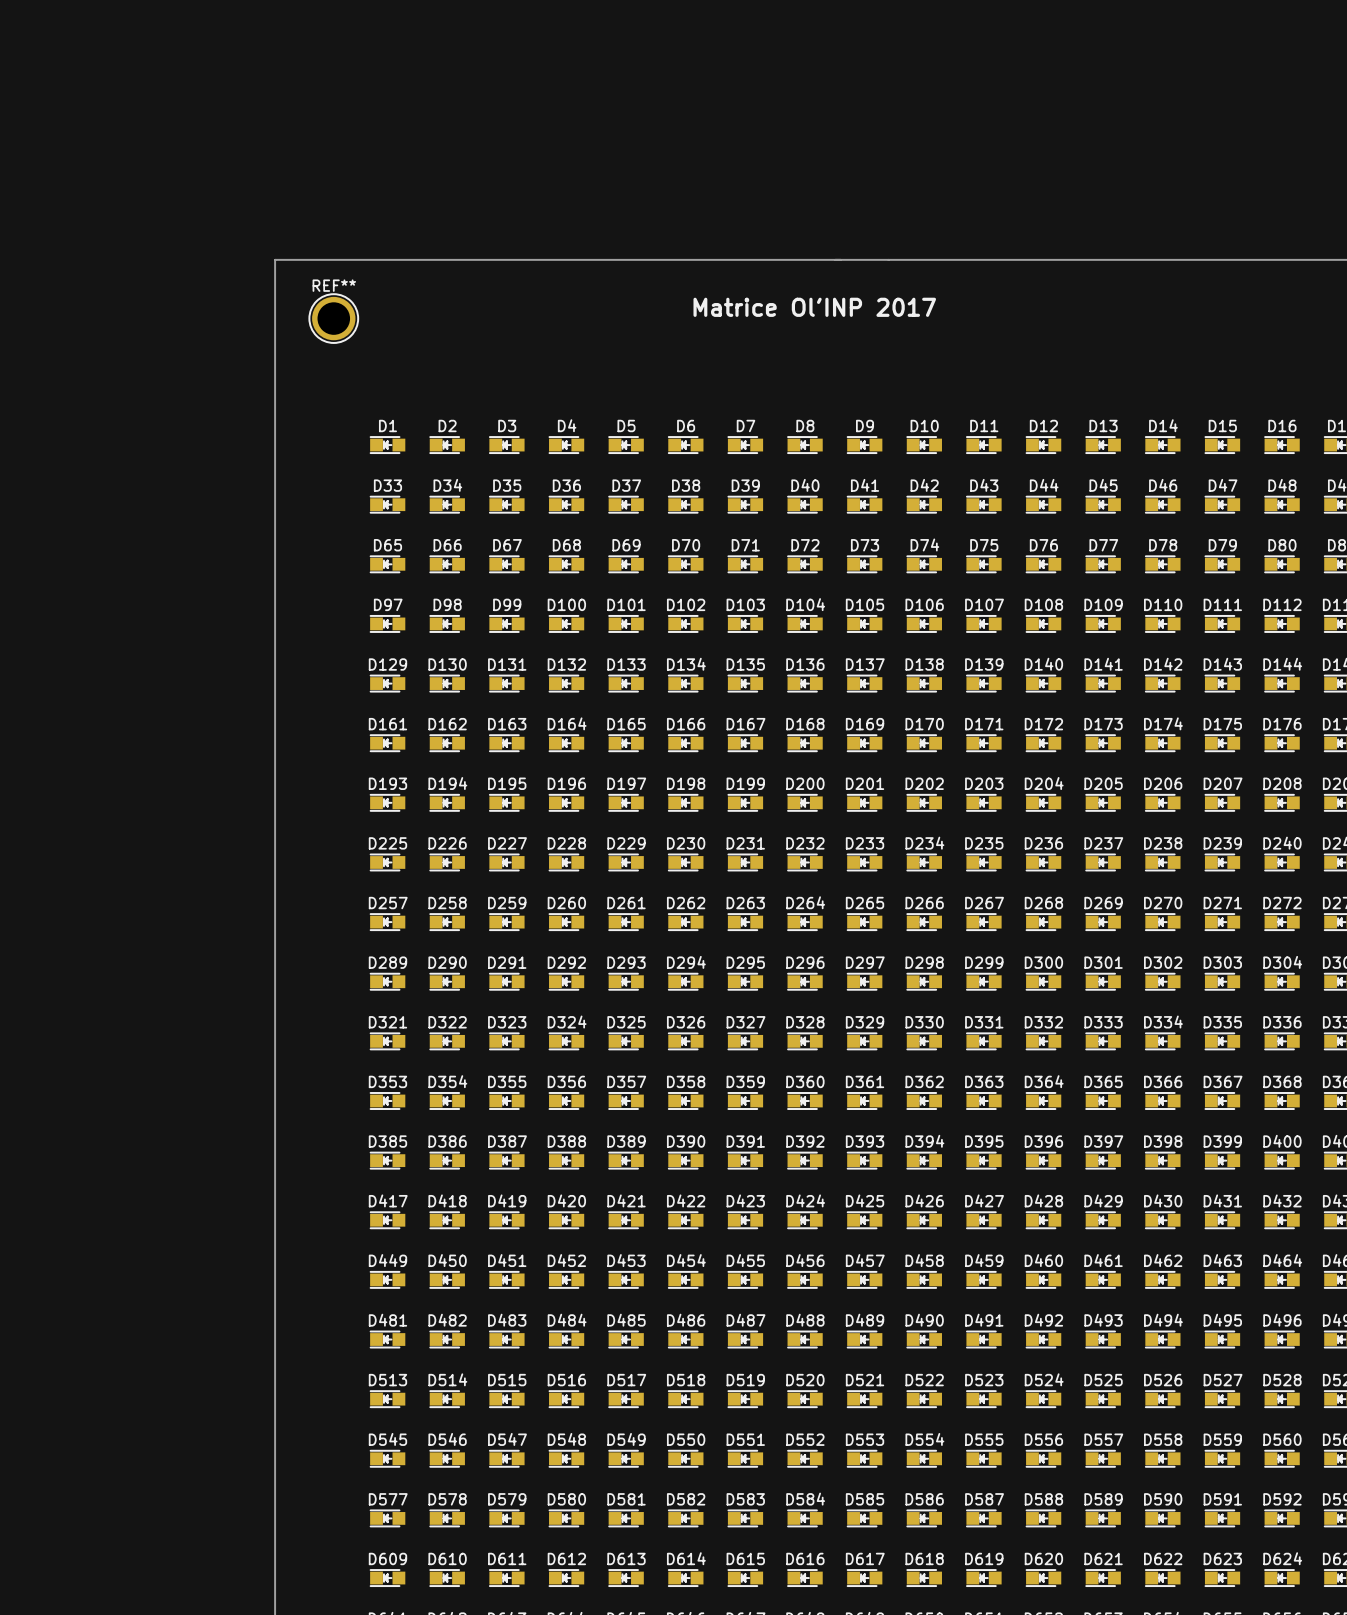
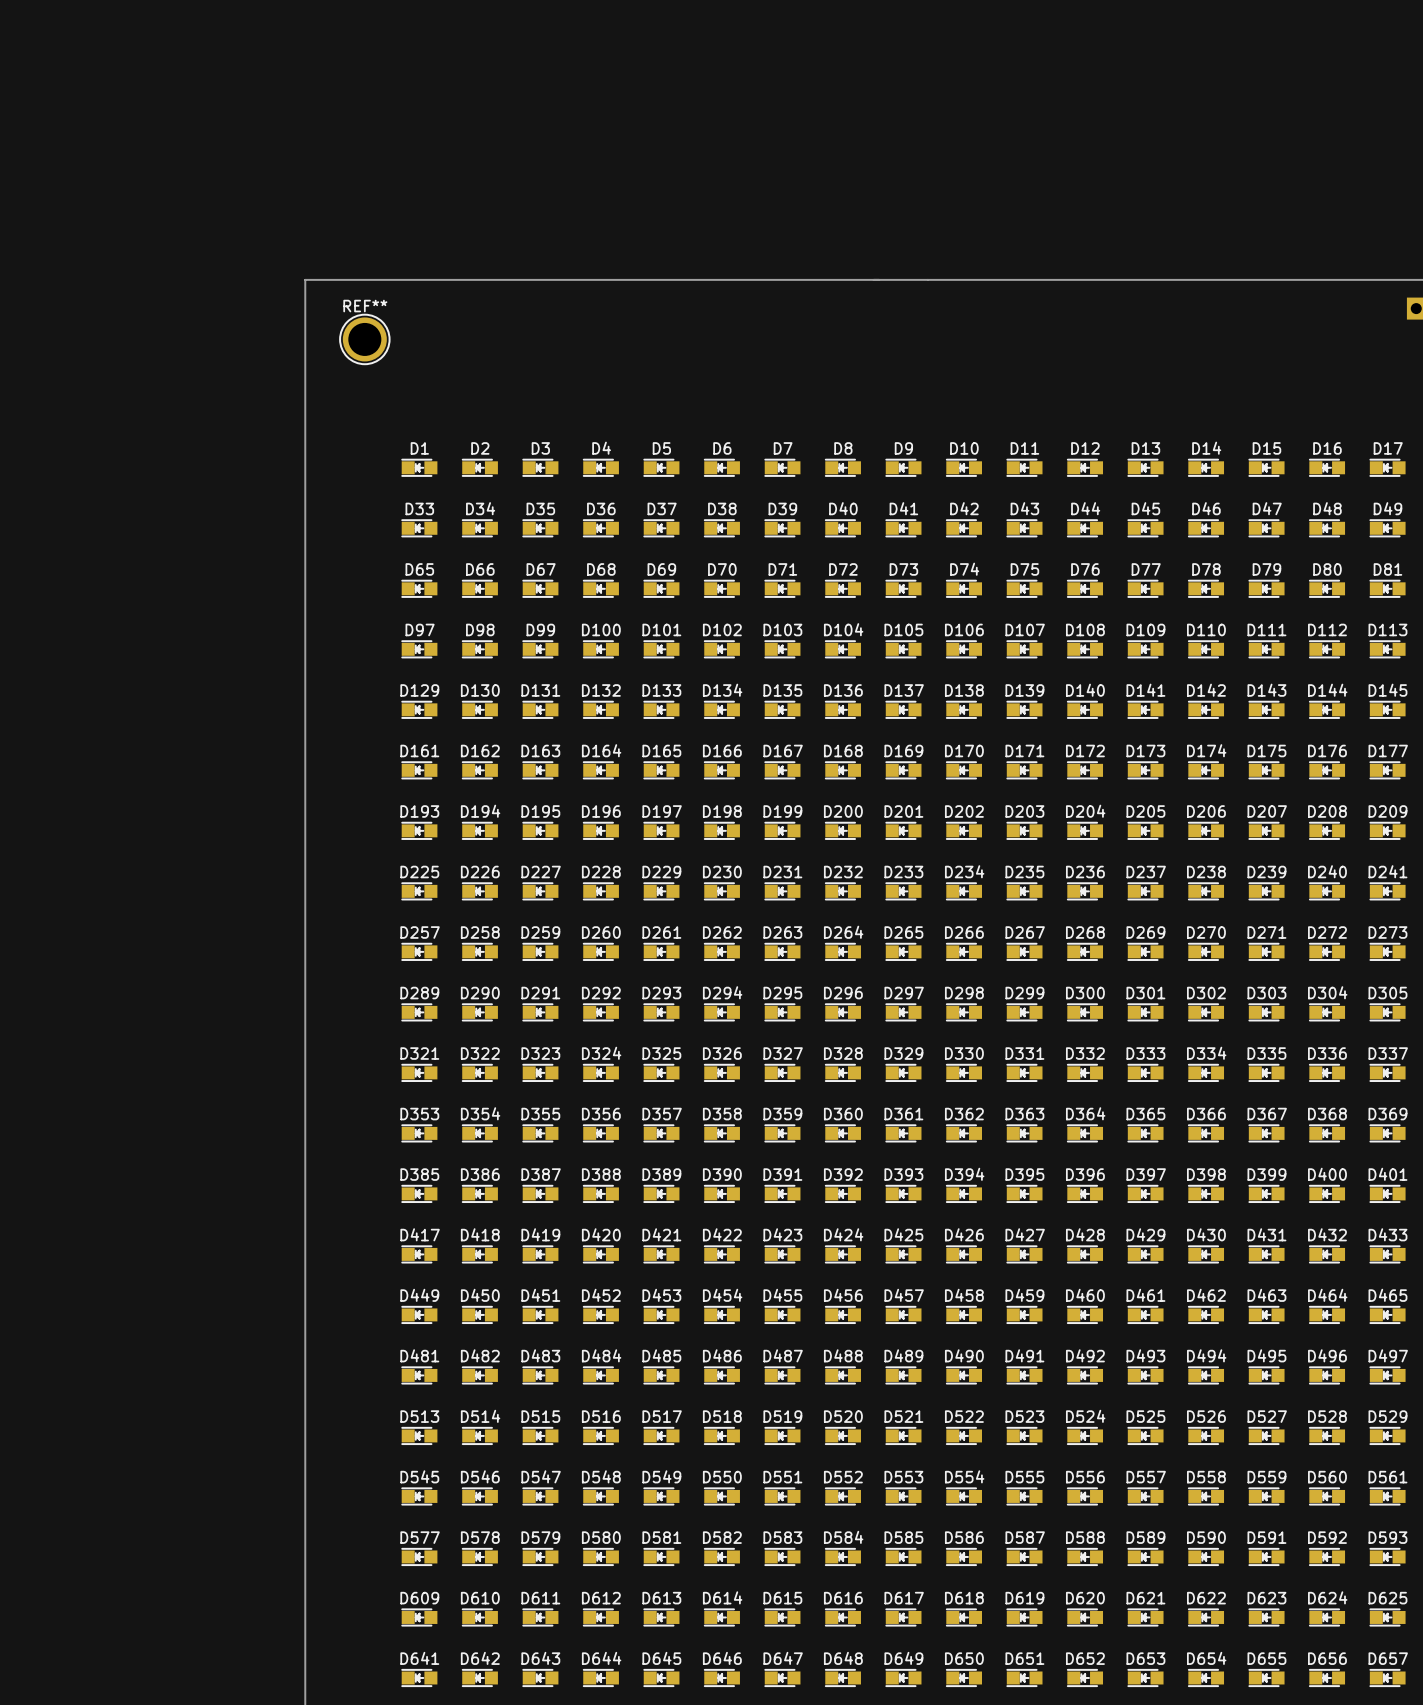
text: Matrice Ol'INP 2017 (814, 307) -> none

